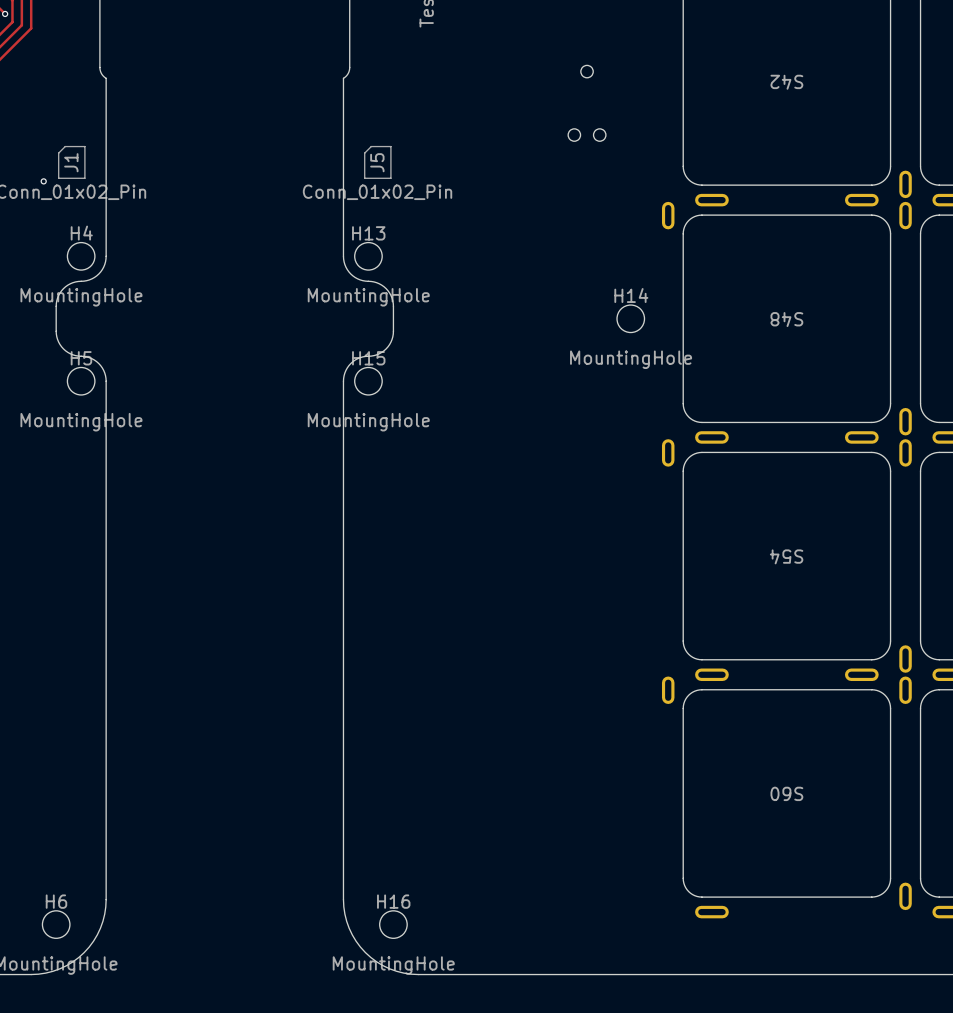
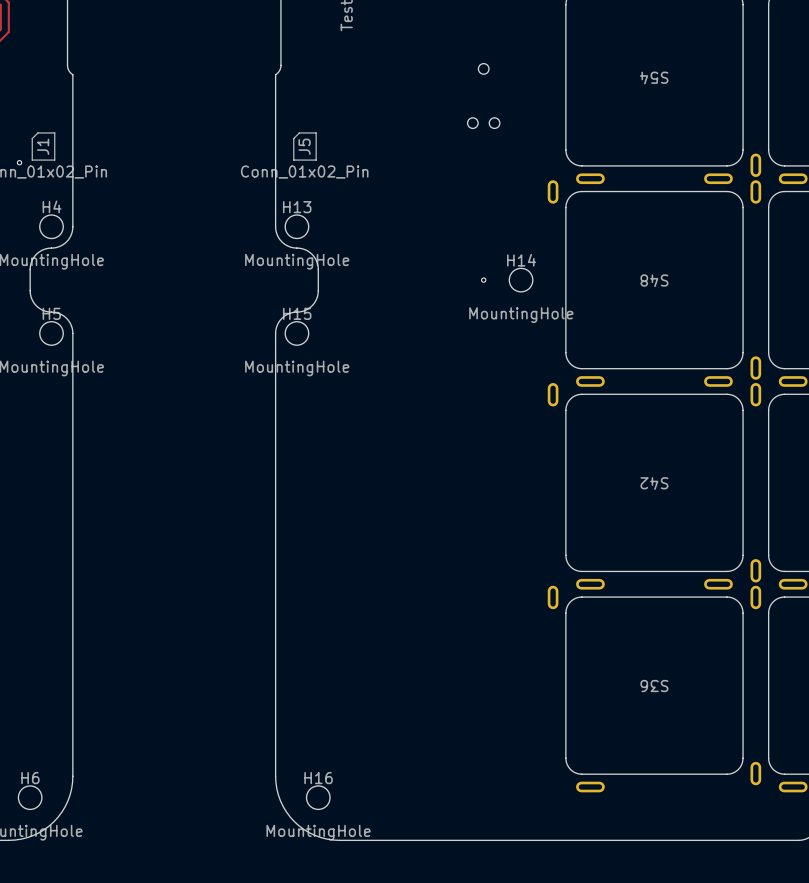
S42 name: S42 (786, 82) -> S54 (654, 78)
via: none -> (483, 280)
S54 name: S54 (786, 556) -> S42 (654, 483)
S60 name: S60 (786, 793) -> S36 (654, 686)

